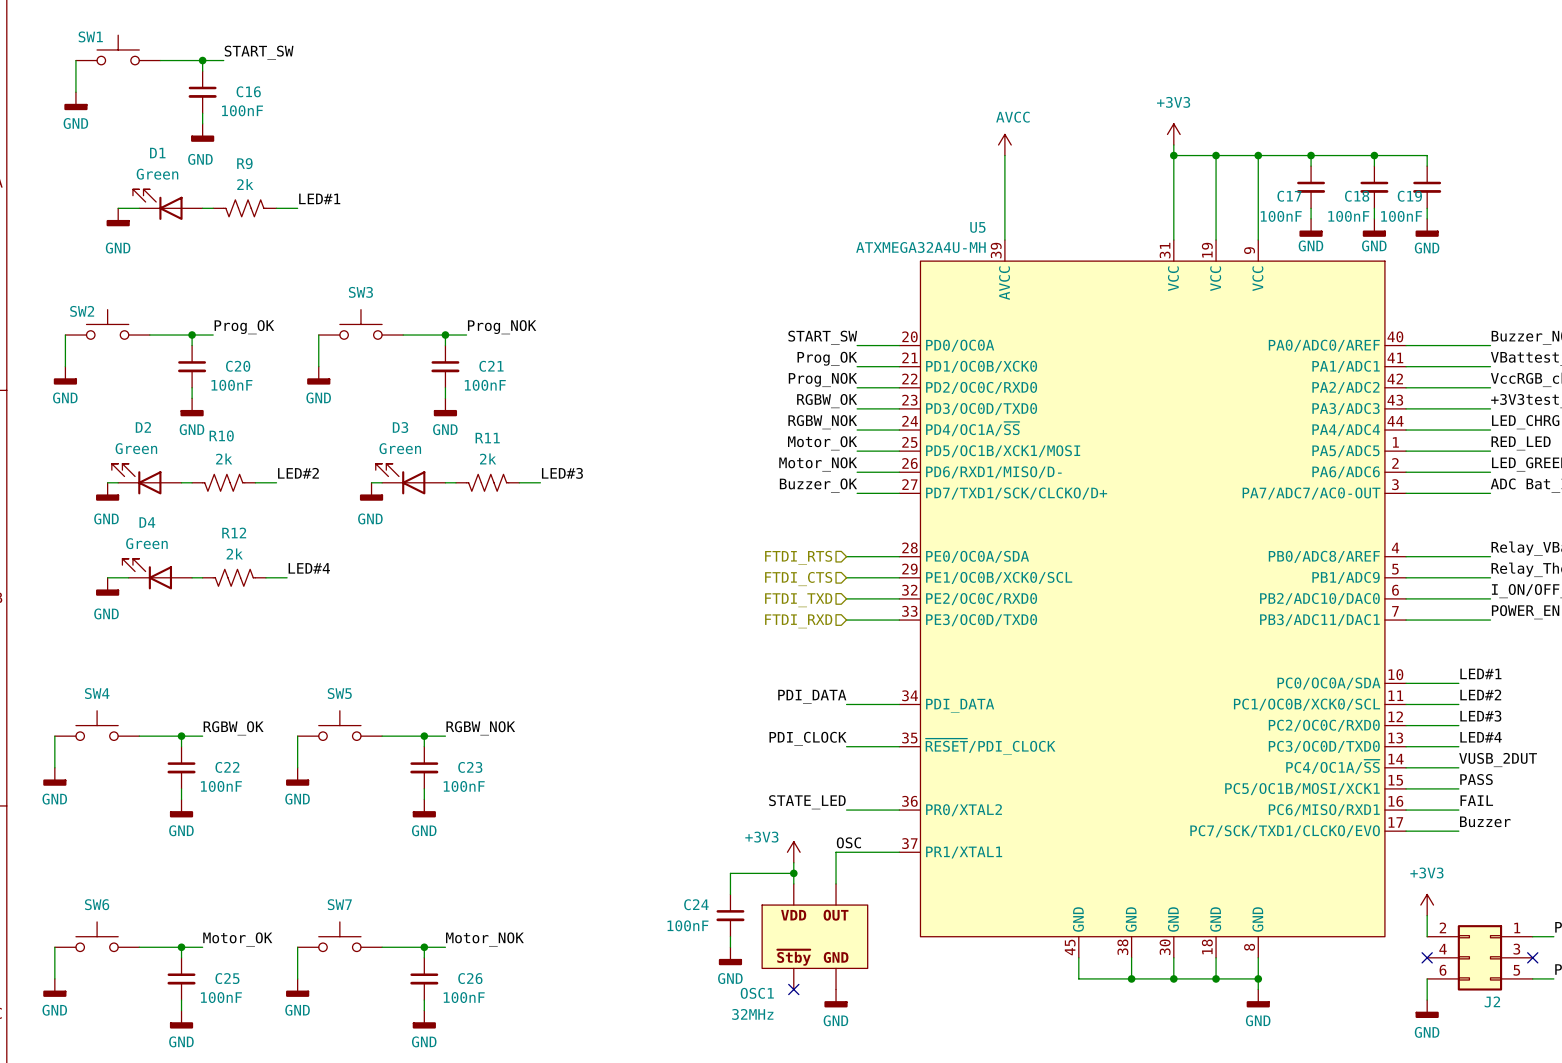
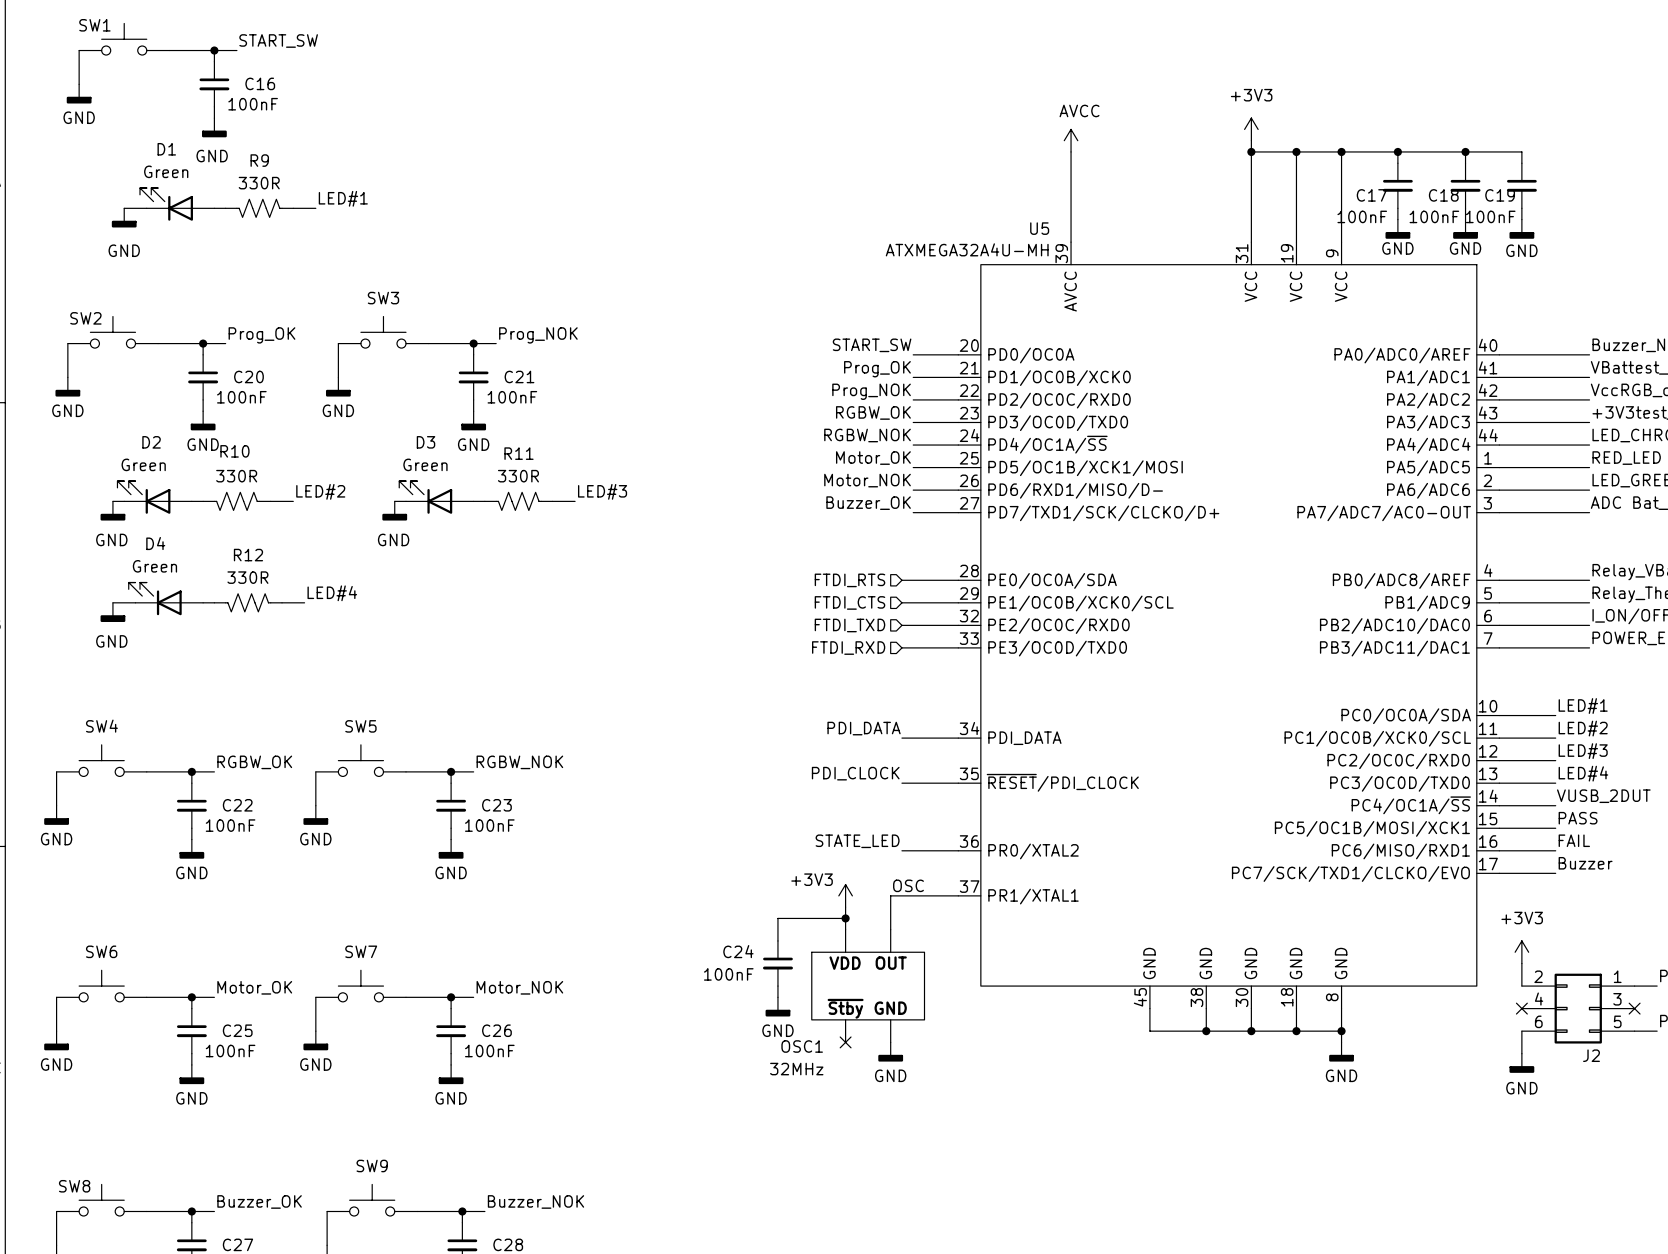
R9 value: 2k (245, 184) -> 330R (259, 183)
R10 value: 2k (224, 458) -> 330R (236, 476)
R11 value: 2k (488, 458) -> 330R (518, 476)
R12 value: 2k (234, 553) -> 330R (247, 577)

